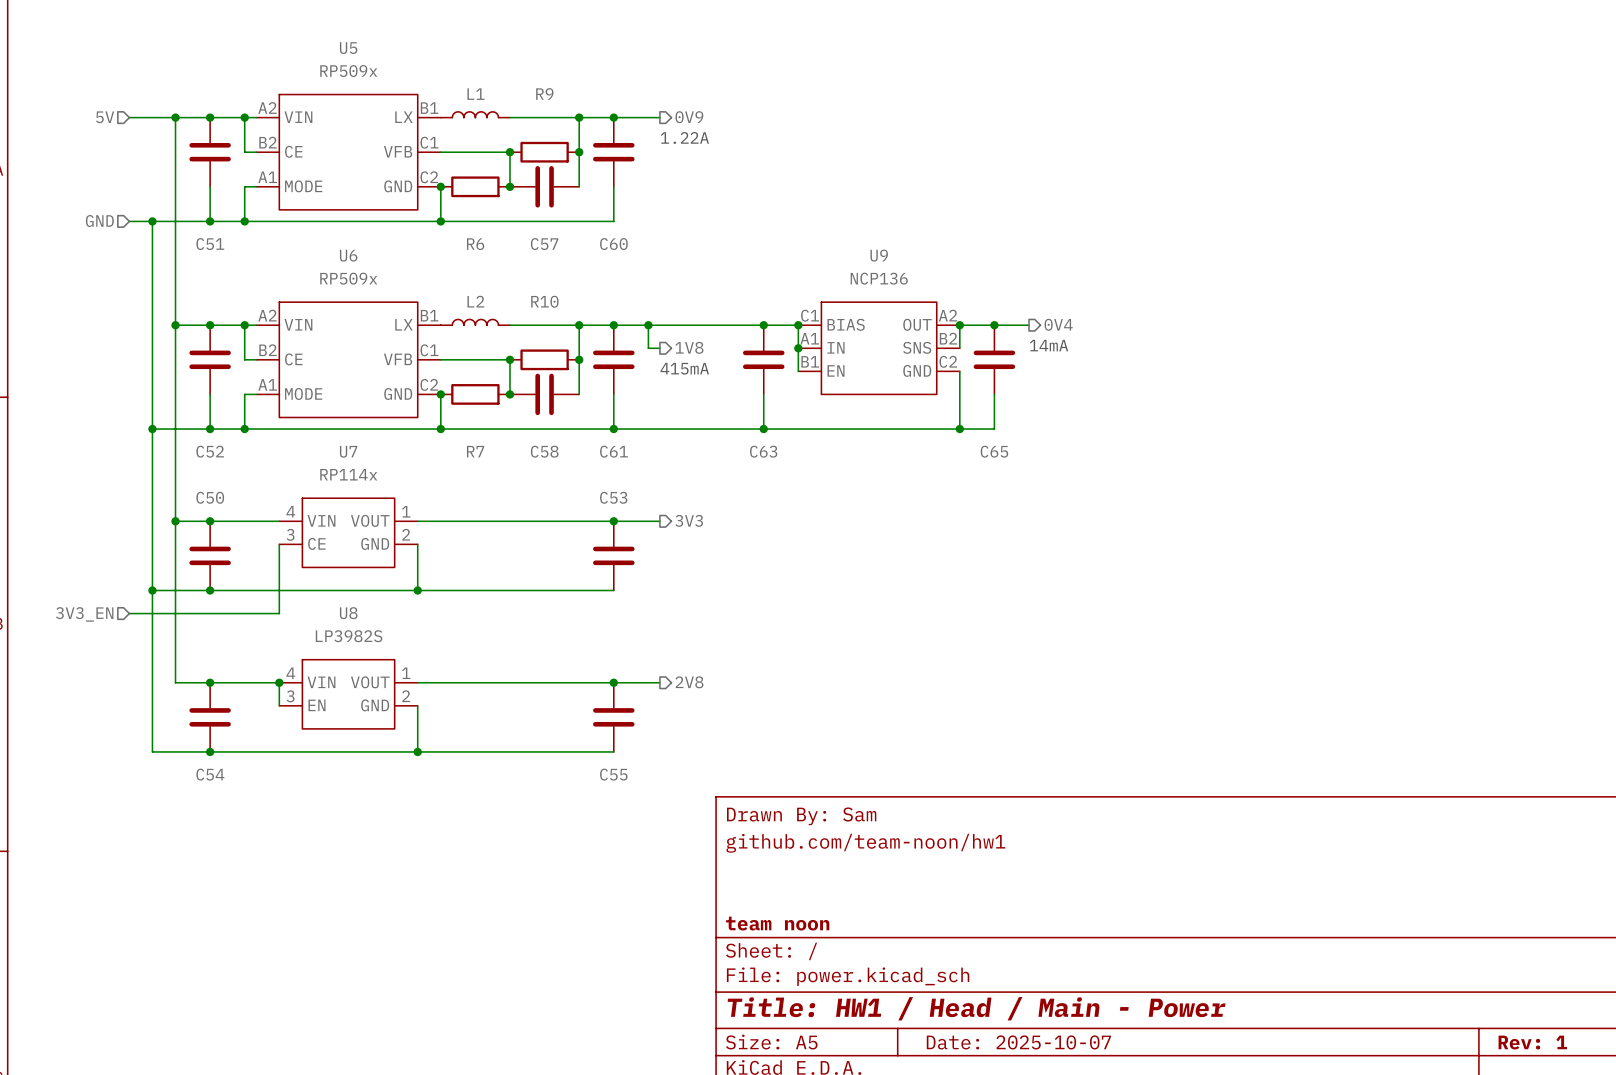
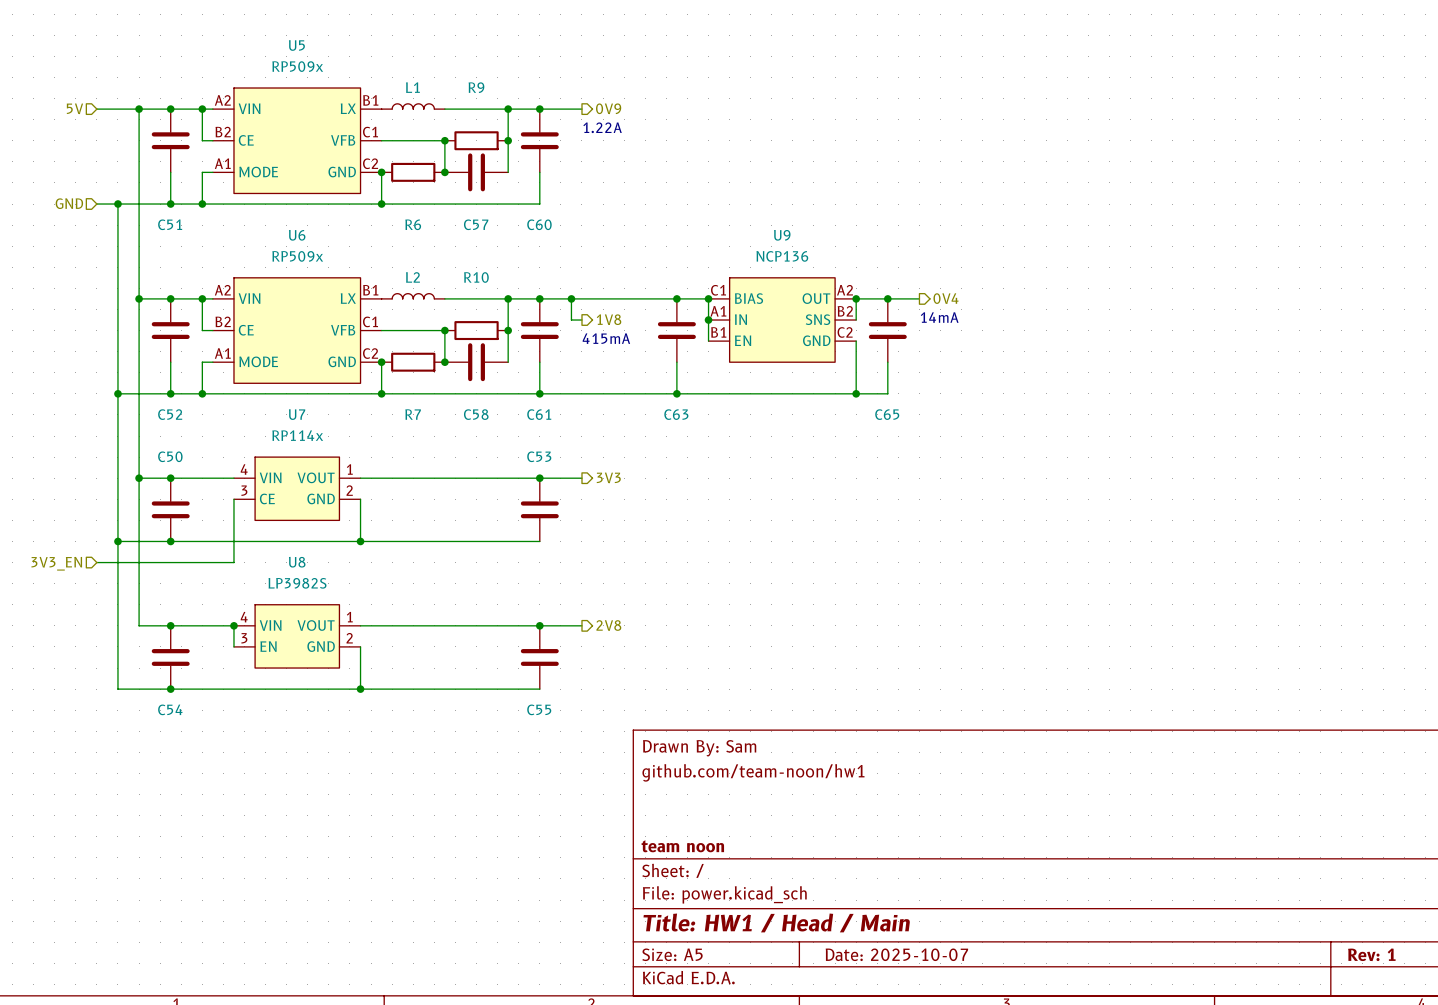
title block: Title: HW1 / Head / Main - Power (976, 1008) -> Title: HW1 / Head / Main (776, 922)

